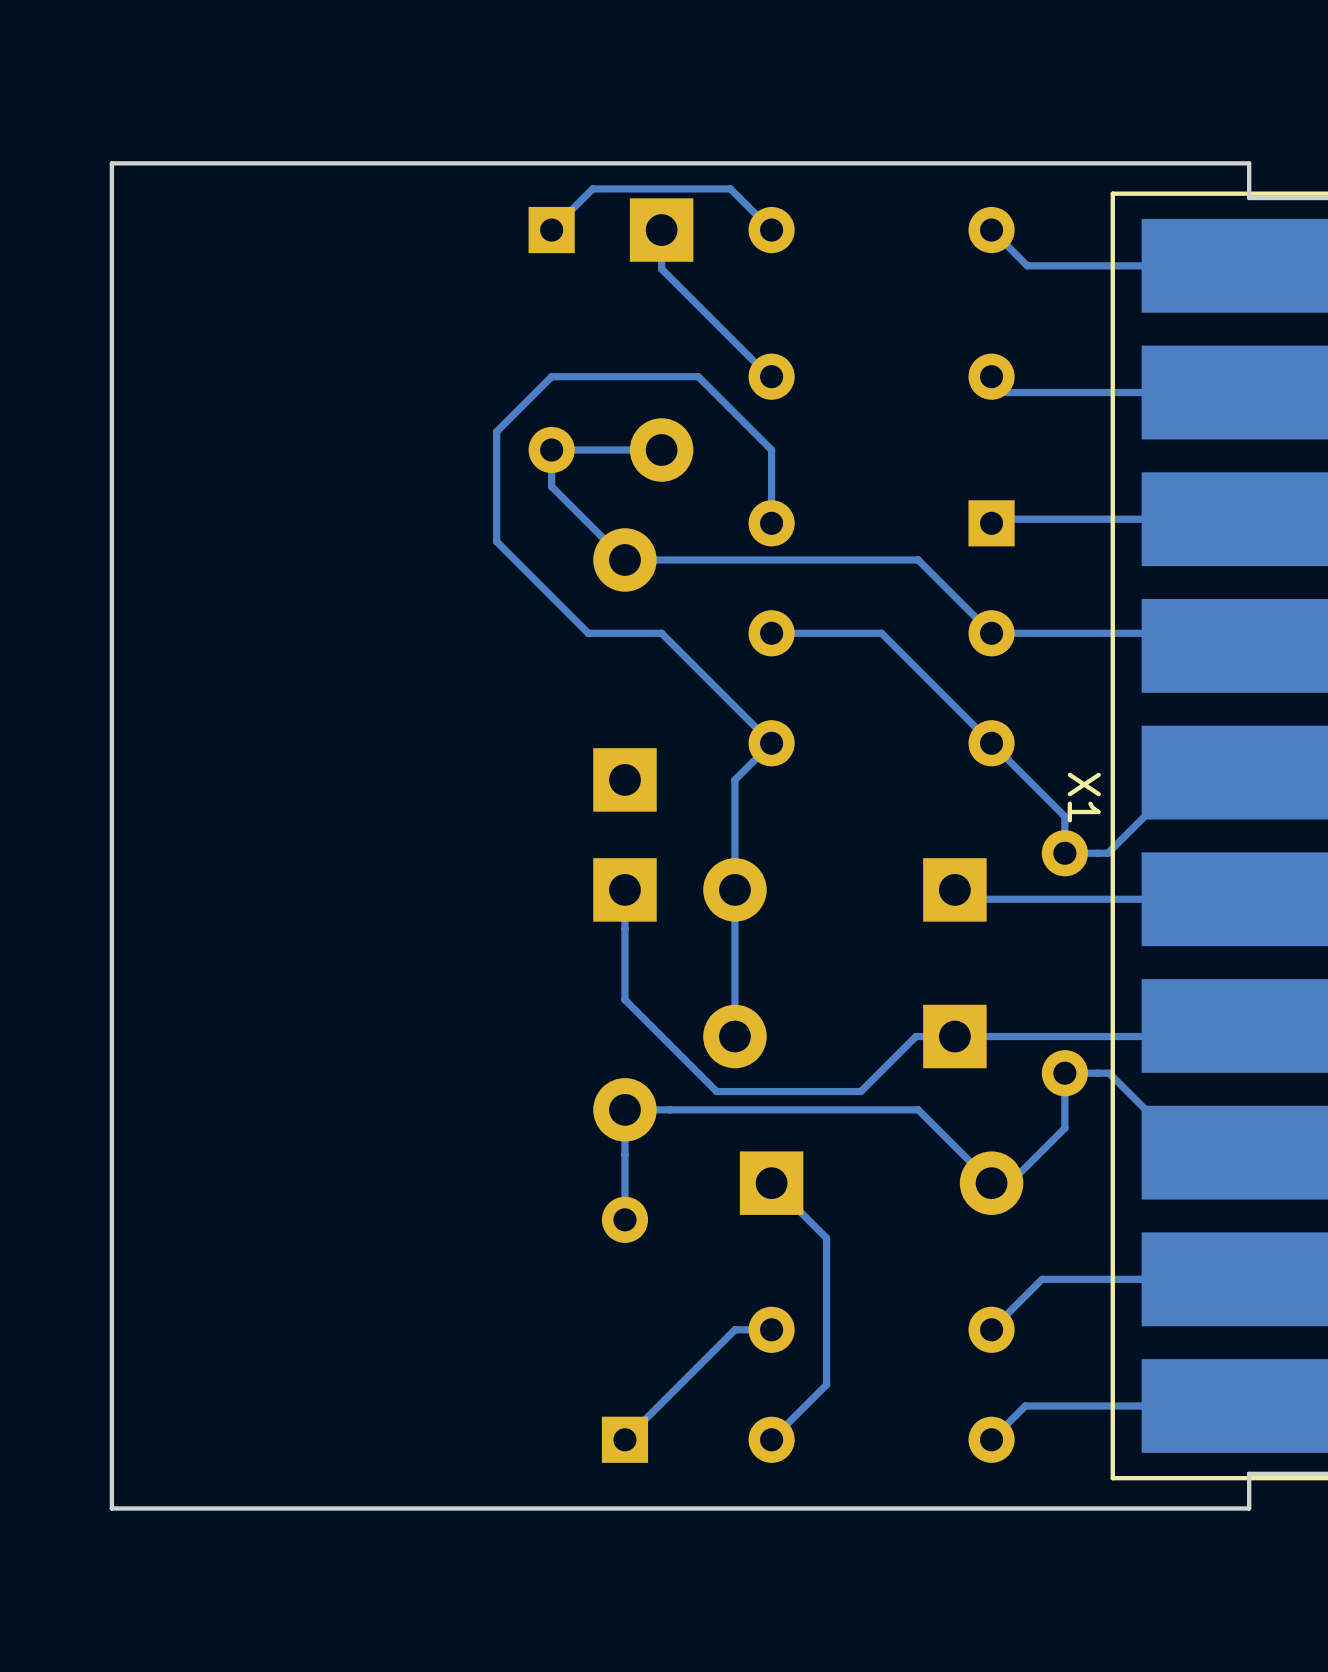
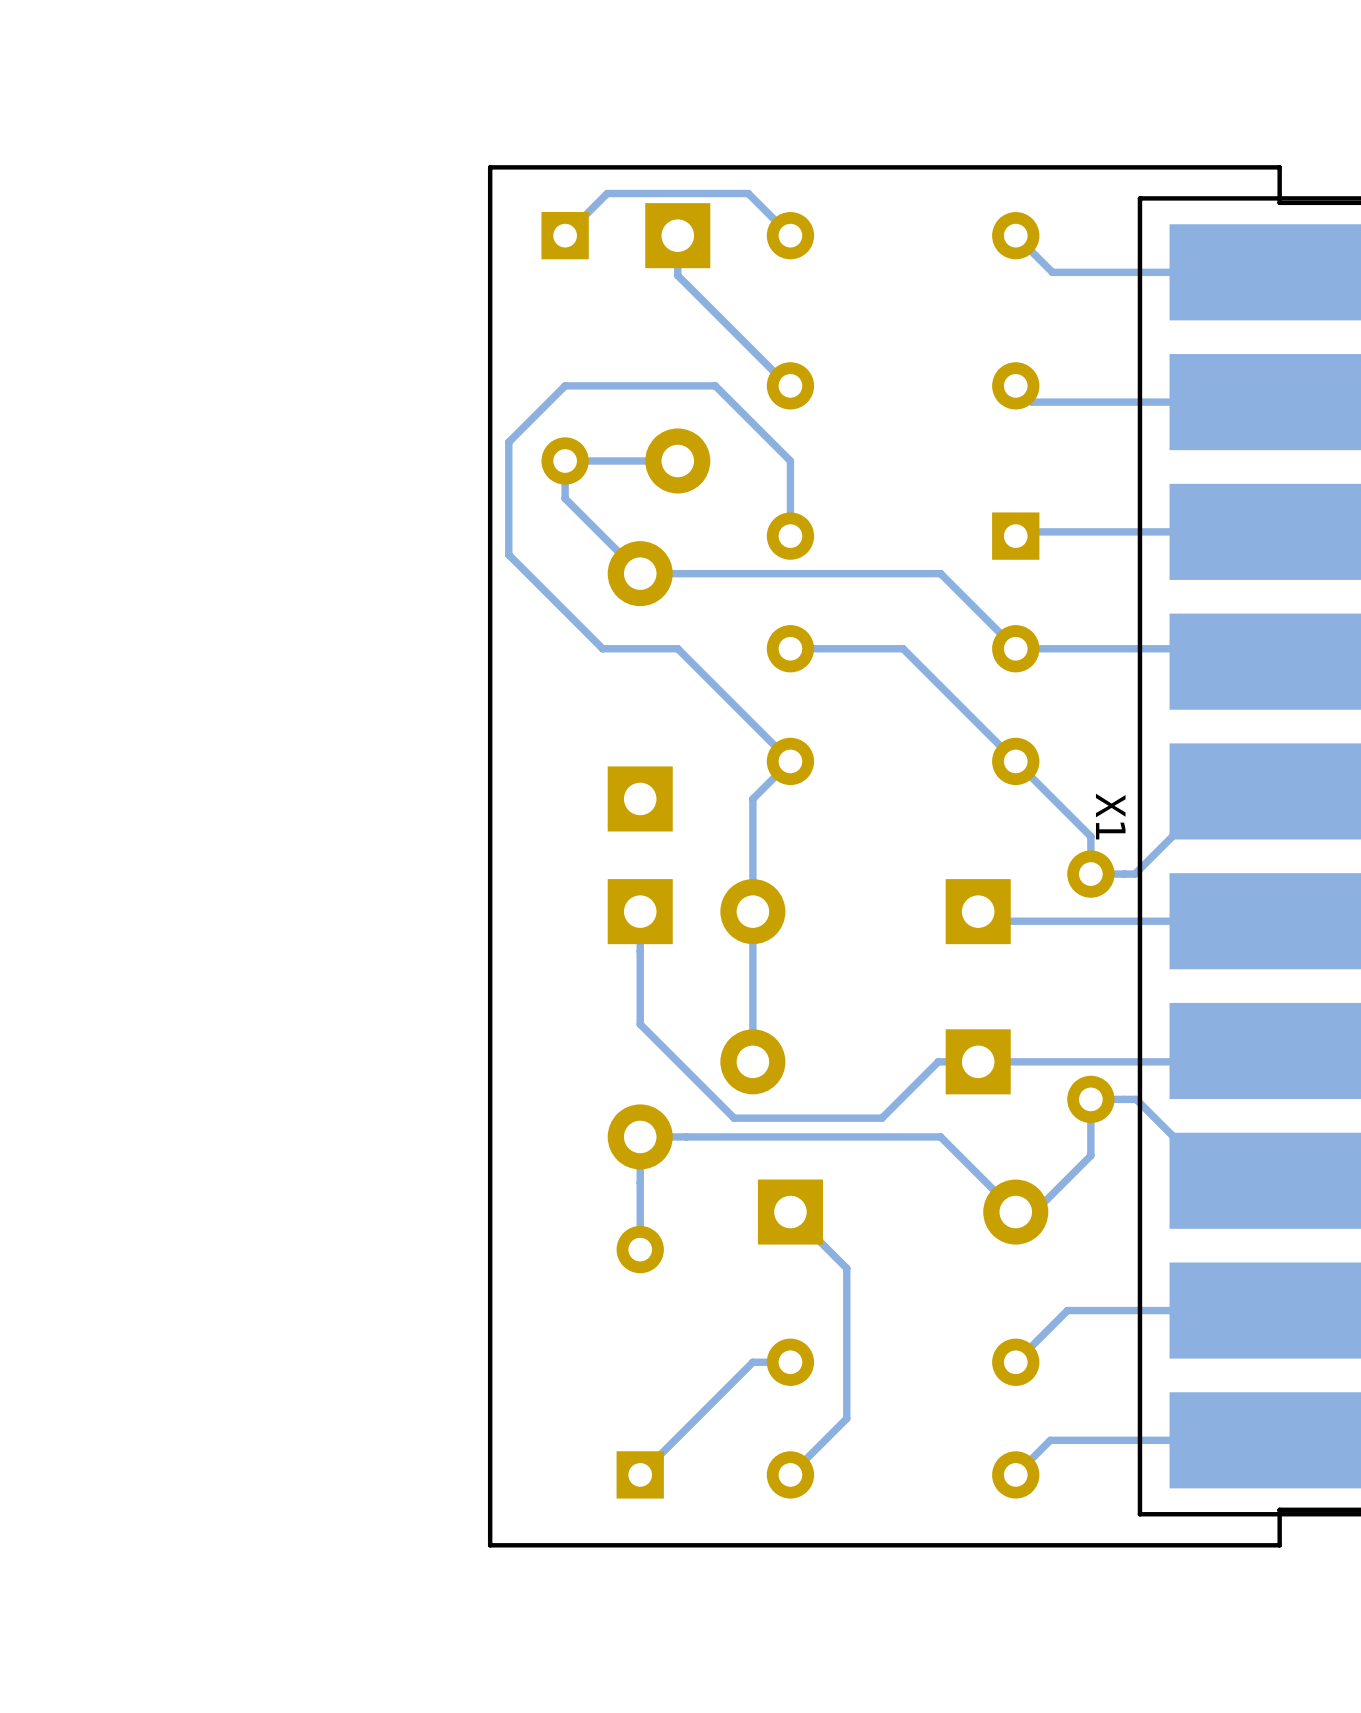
board edge: (478, 163) (111, 163) (111, 1508) (478, 1508) -> (490, 167) (490, 1545)

